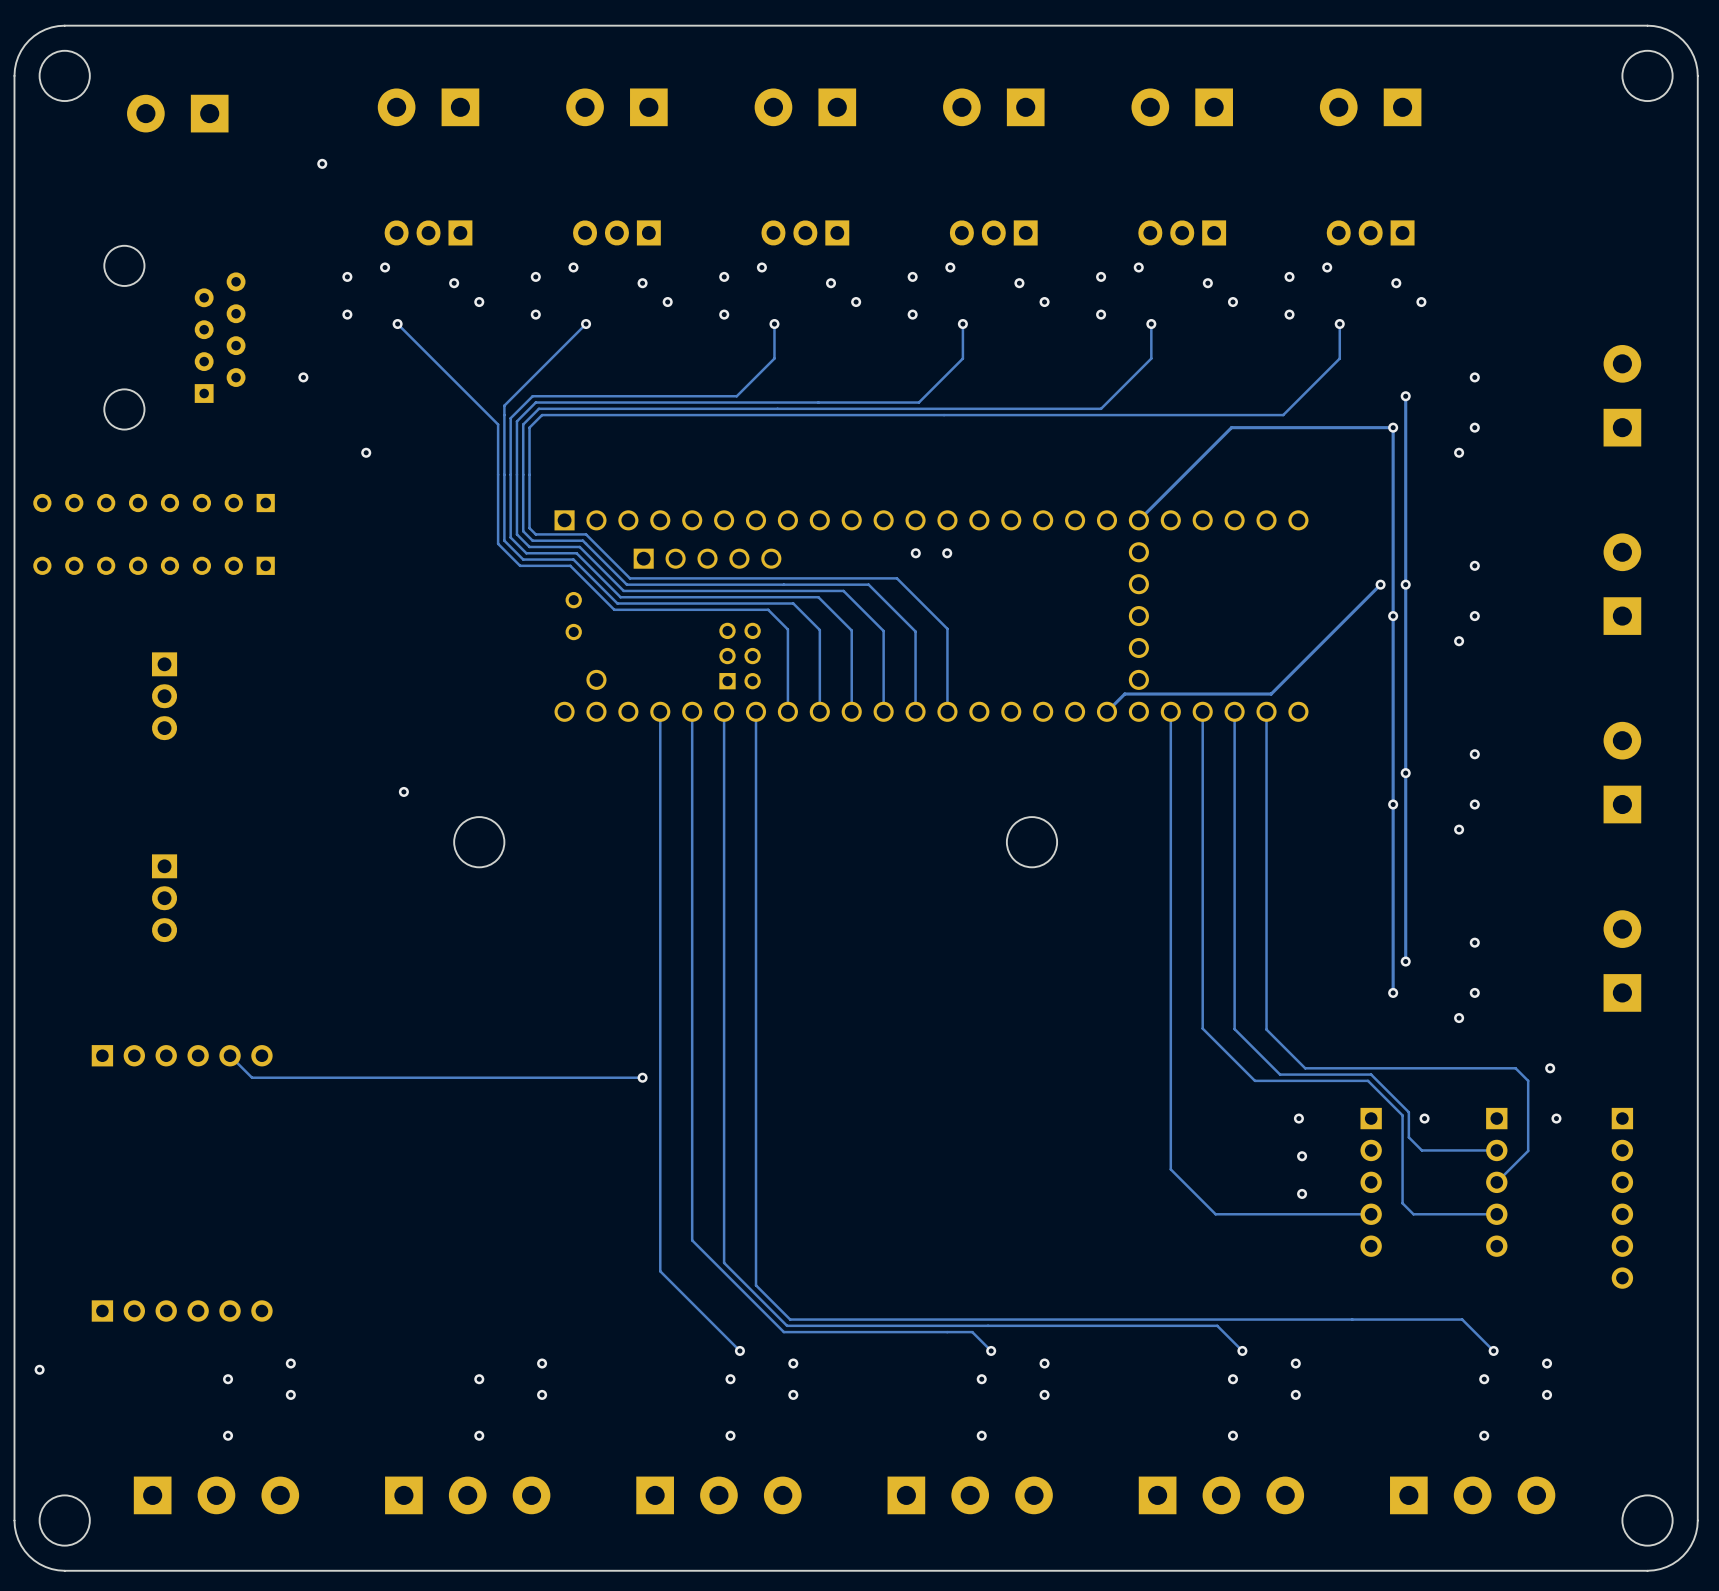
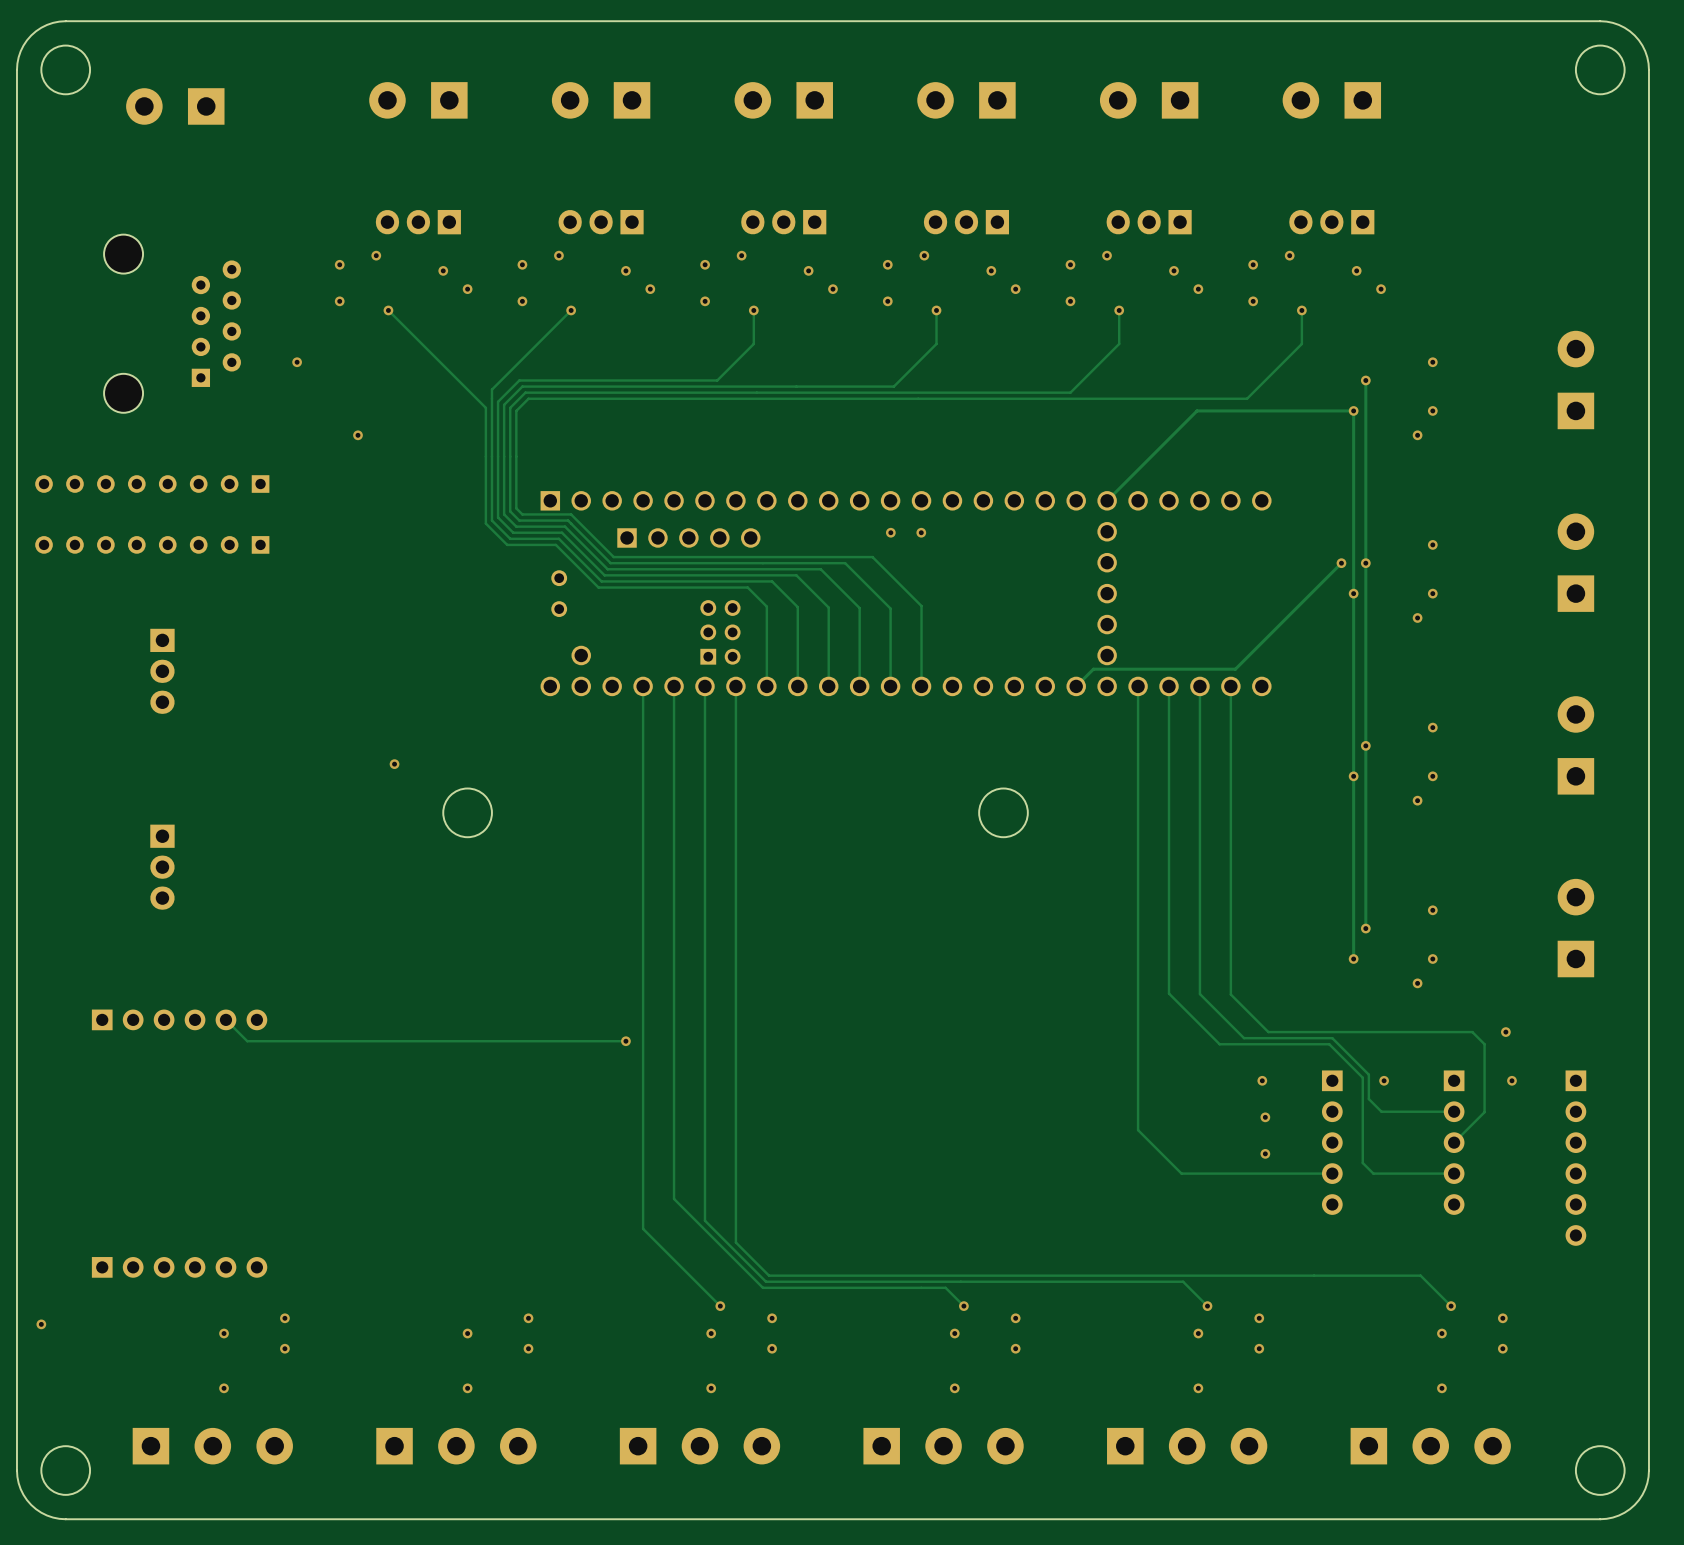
via: (322, 163) -> none

